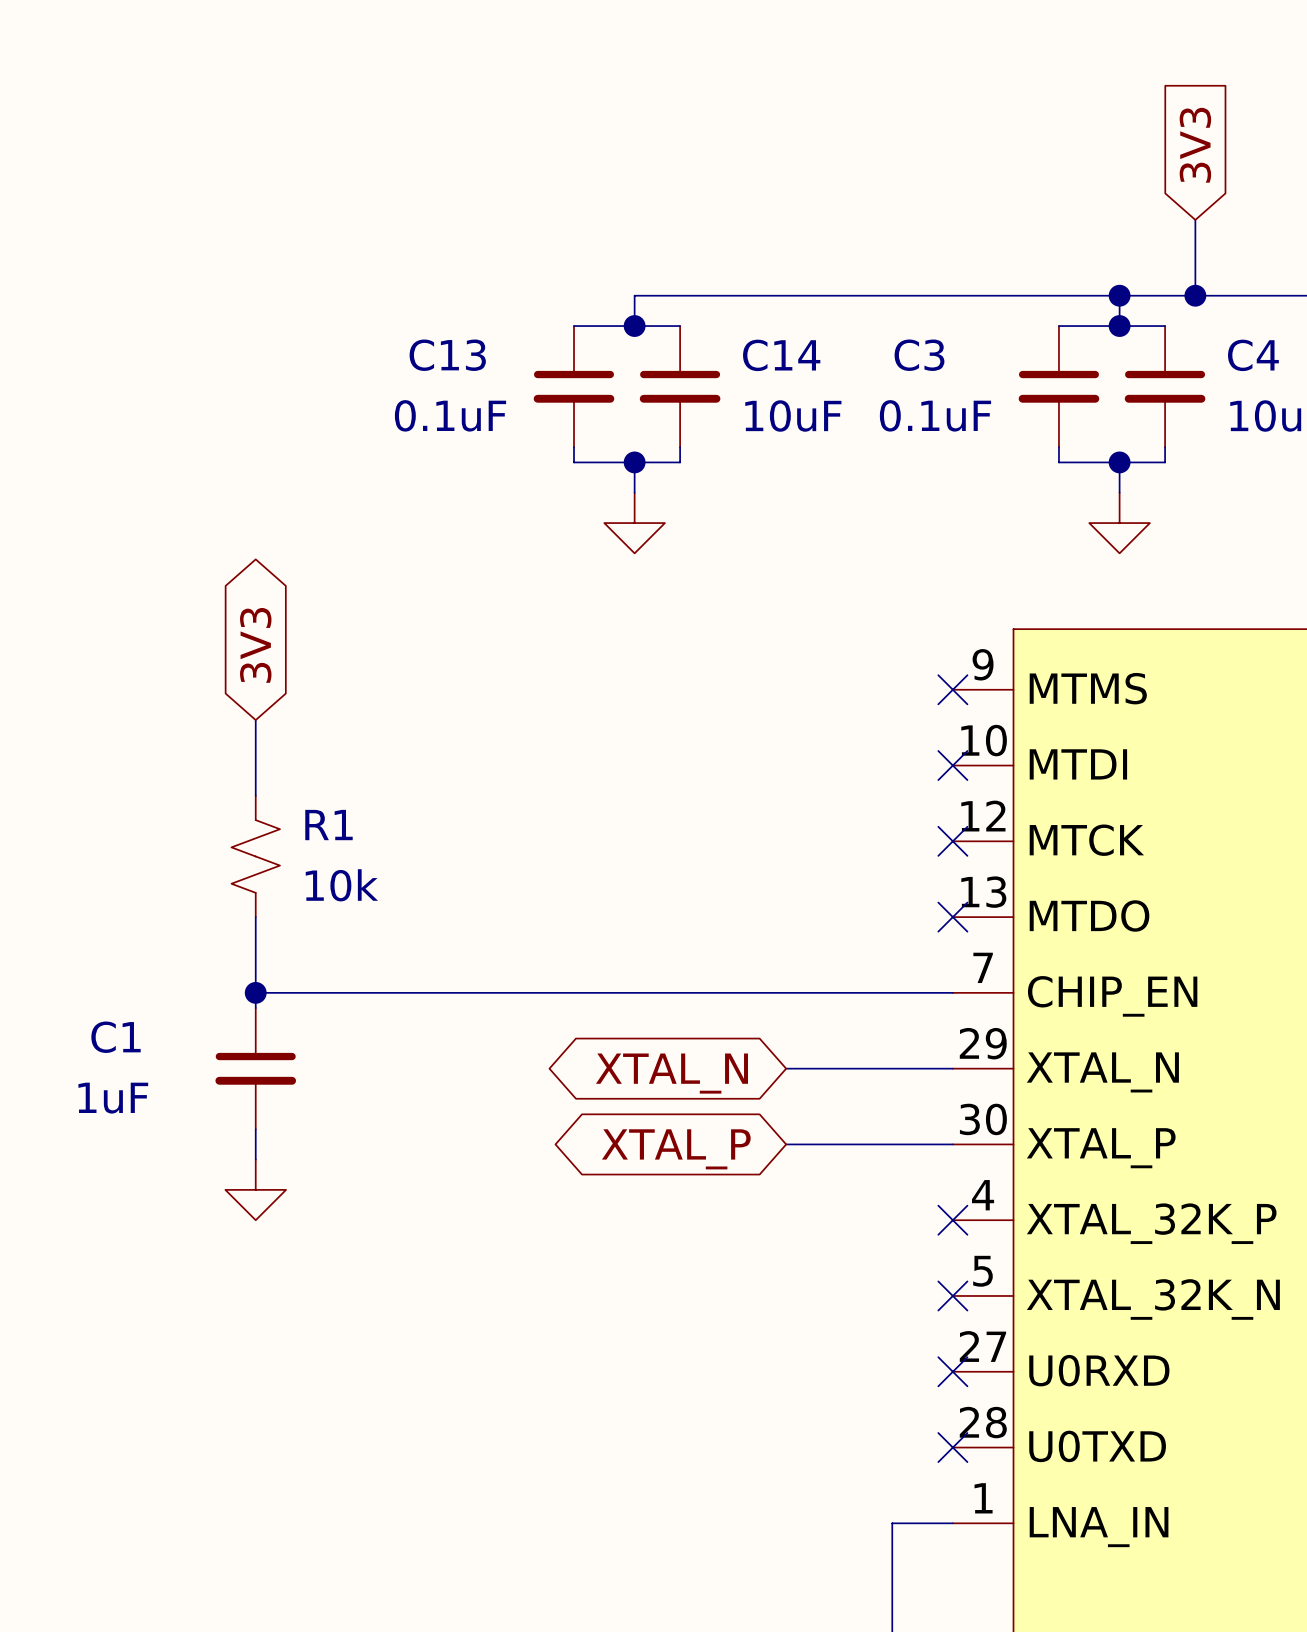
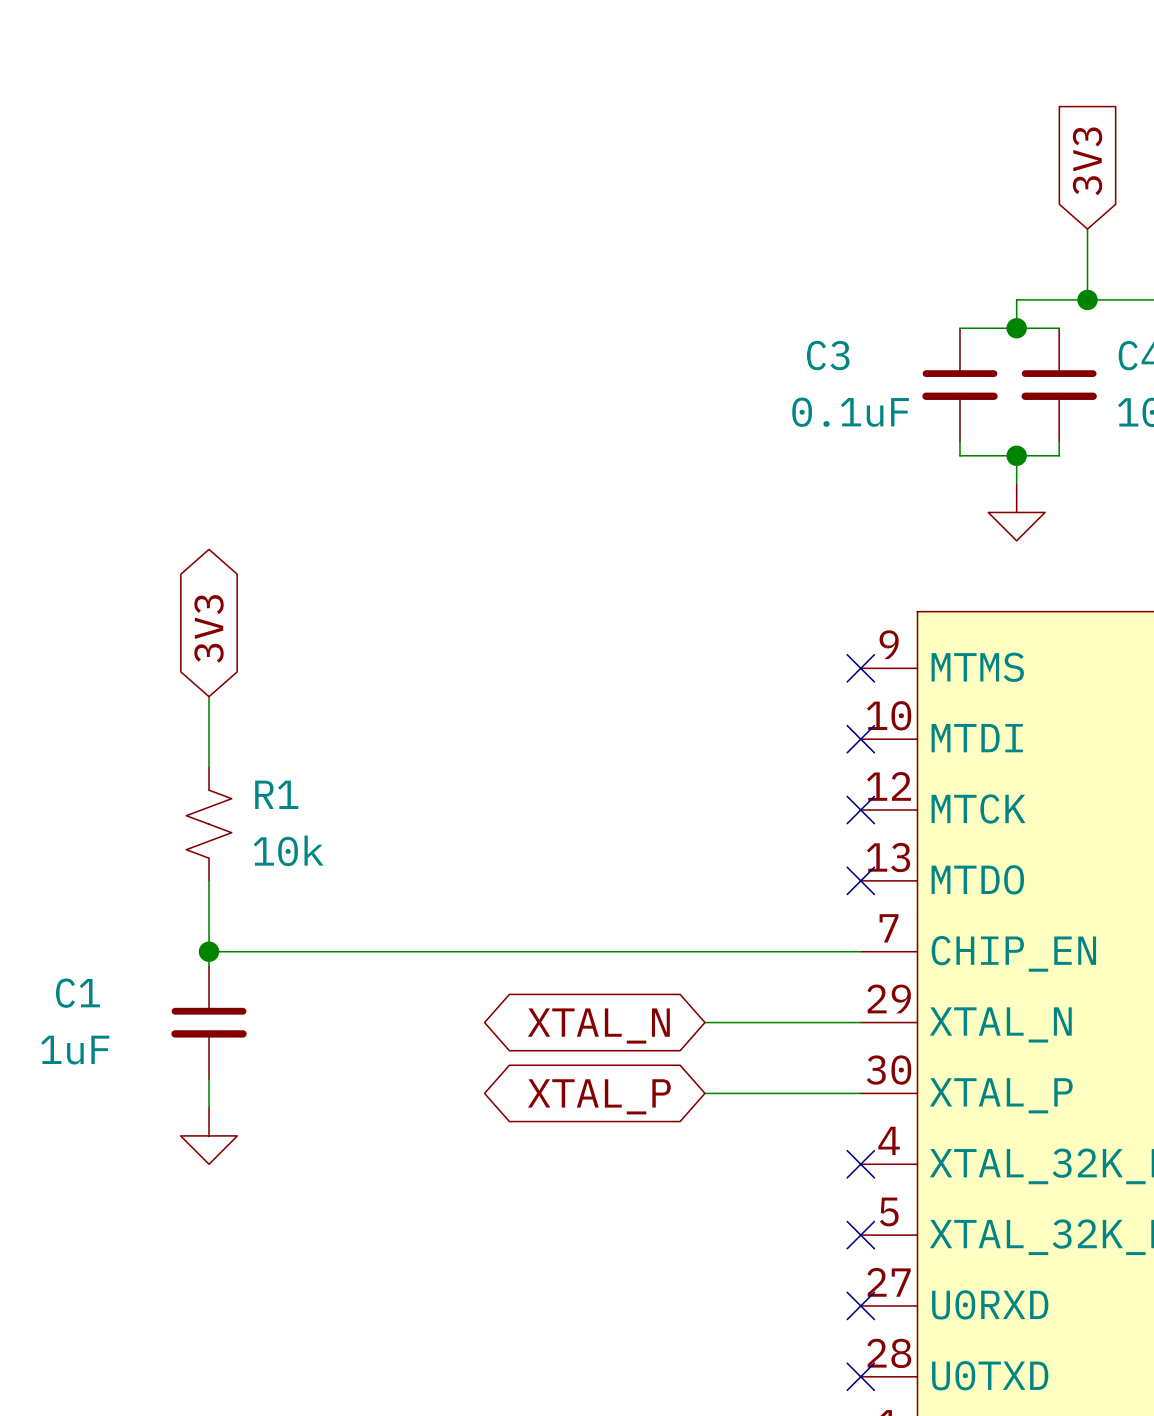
wire: (1119, 295) (634, 295) (634, 326) -> none
junction: (1119, 295) -> none
wire: (574, 326) (680, 326) -> none
junction: (634, 326) -> none
C13: 0.1uF (574, 386) -> none
C14: 10uF (680, 386) -> none
wire: (574, 447) (574, 462) (680, 462) (680, 447) -> none
wire: (634, 462) (634, 492) -> none
junction: (634, 462) -> none
power symbol: (634, 523) -> none

